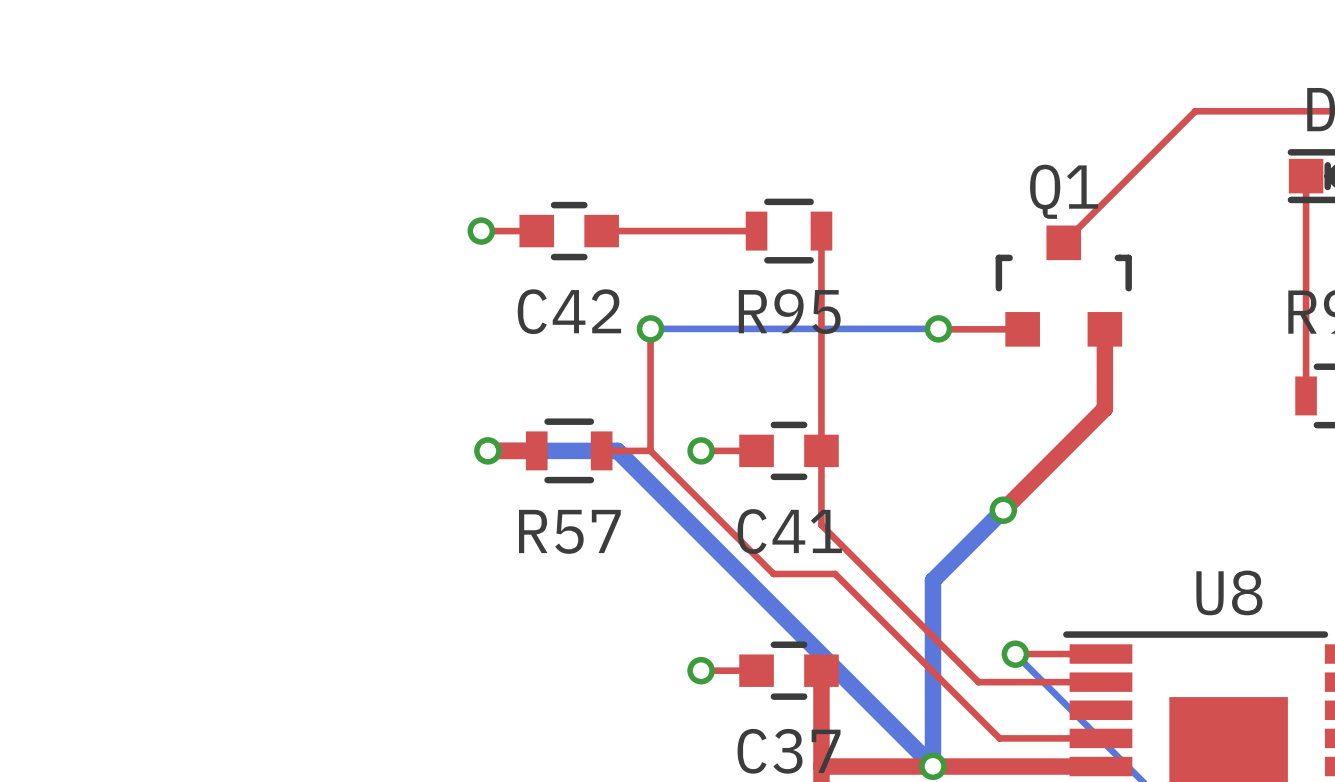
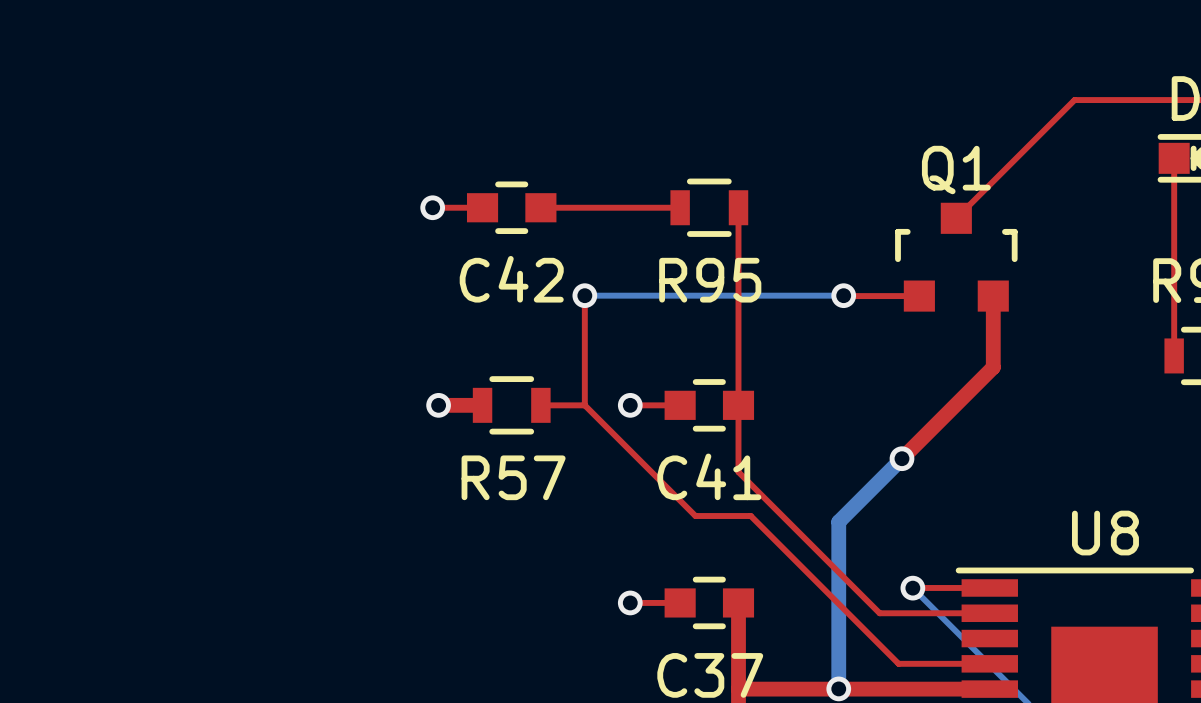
bottom track: (487, 450) (617, 450) (932, 766) -> none

